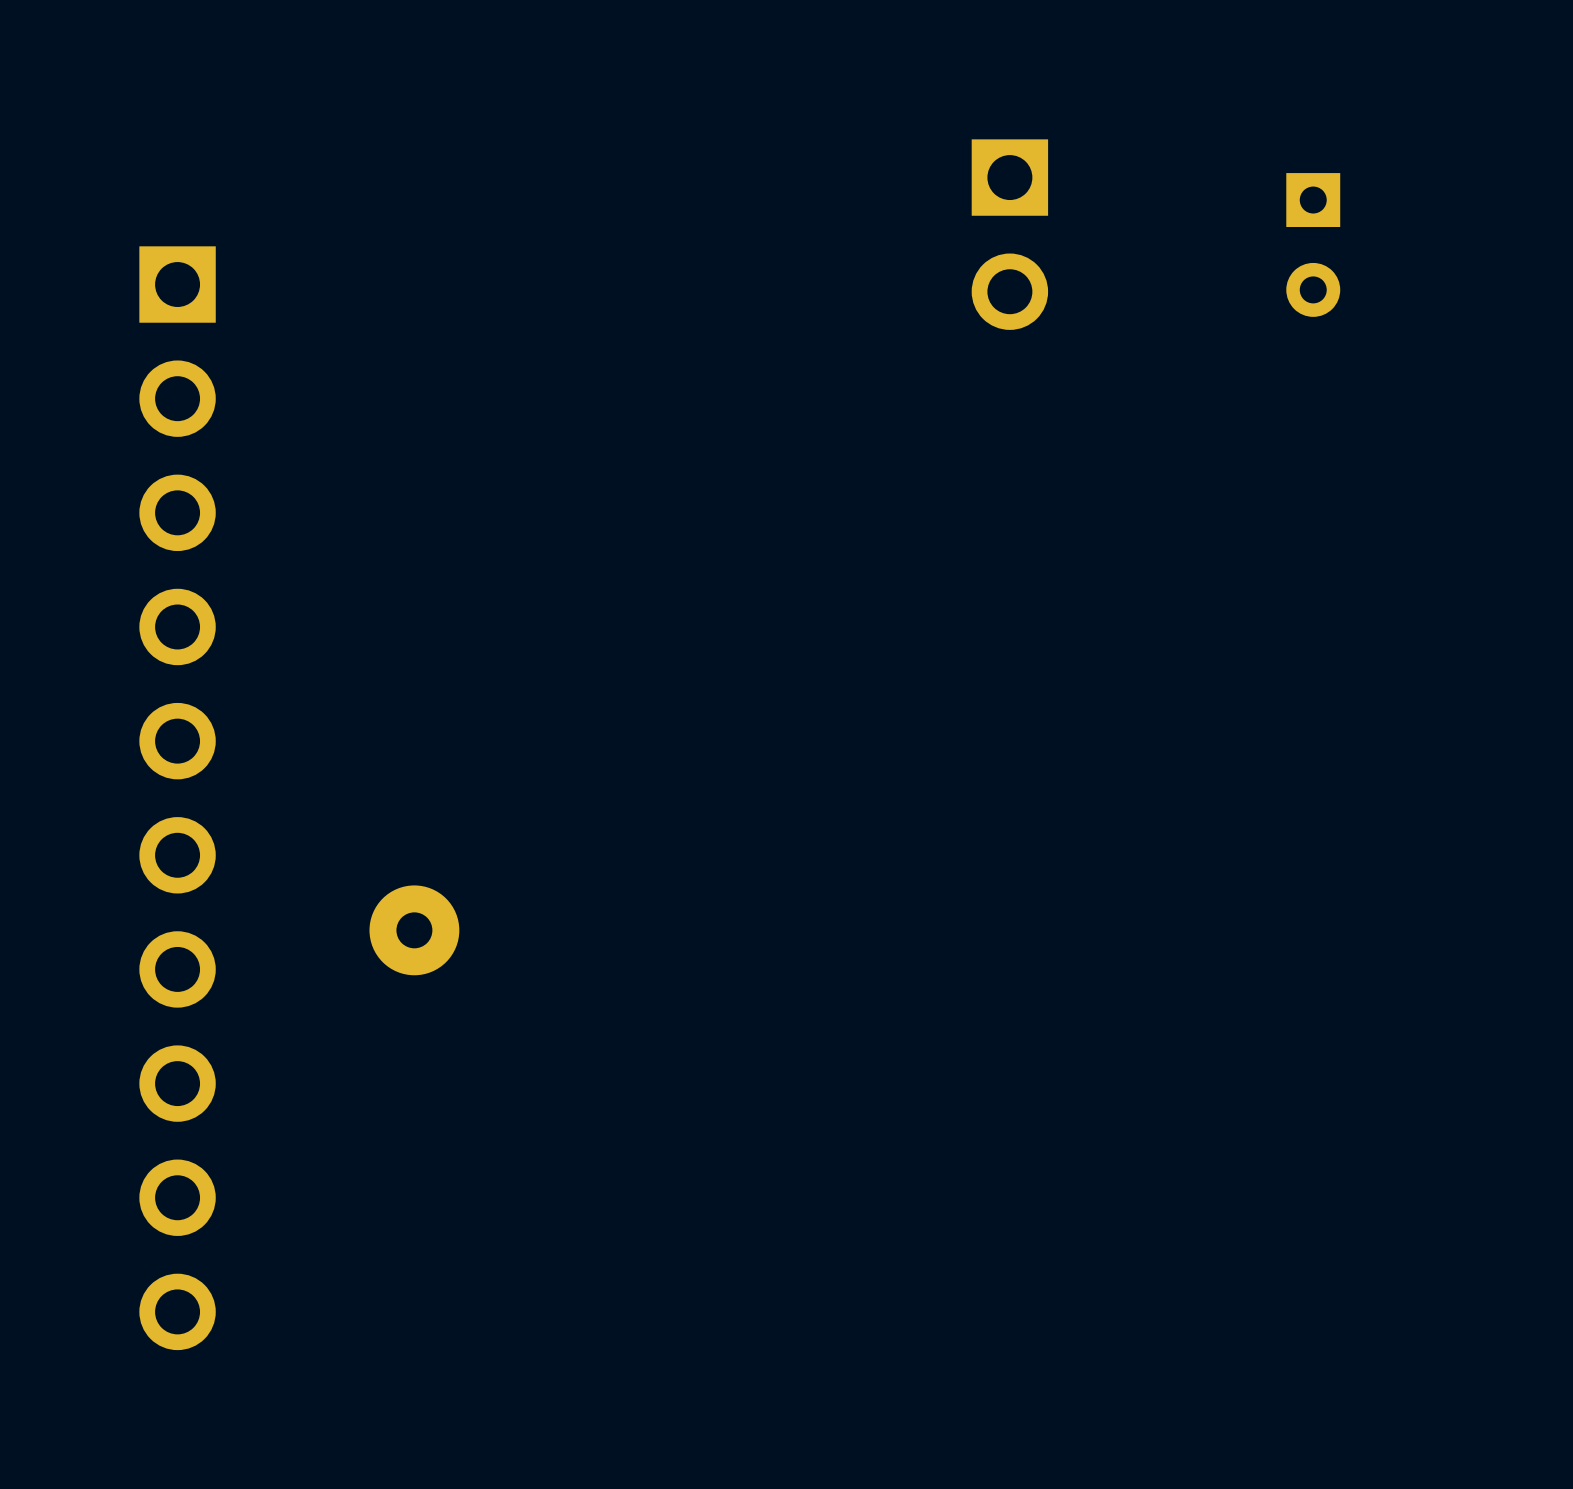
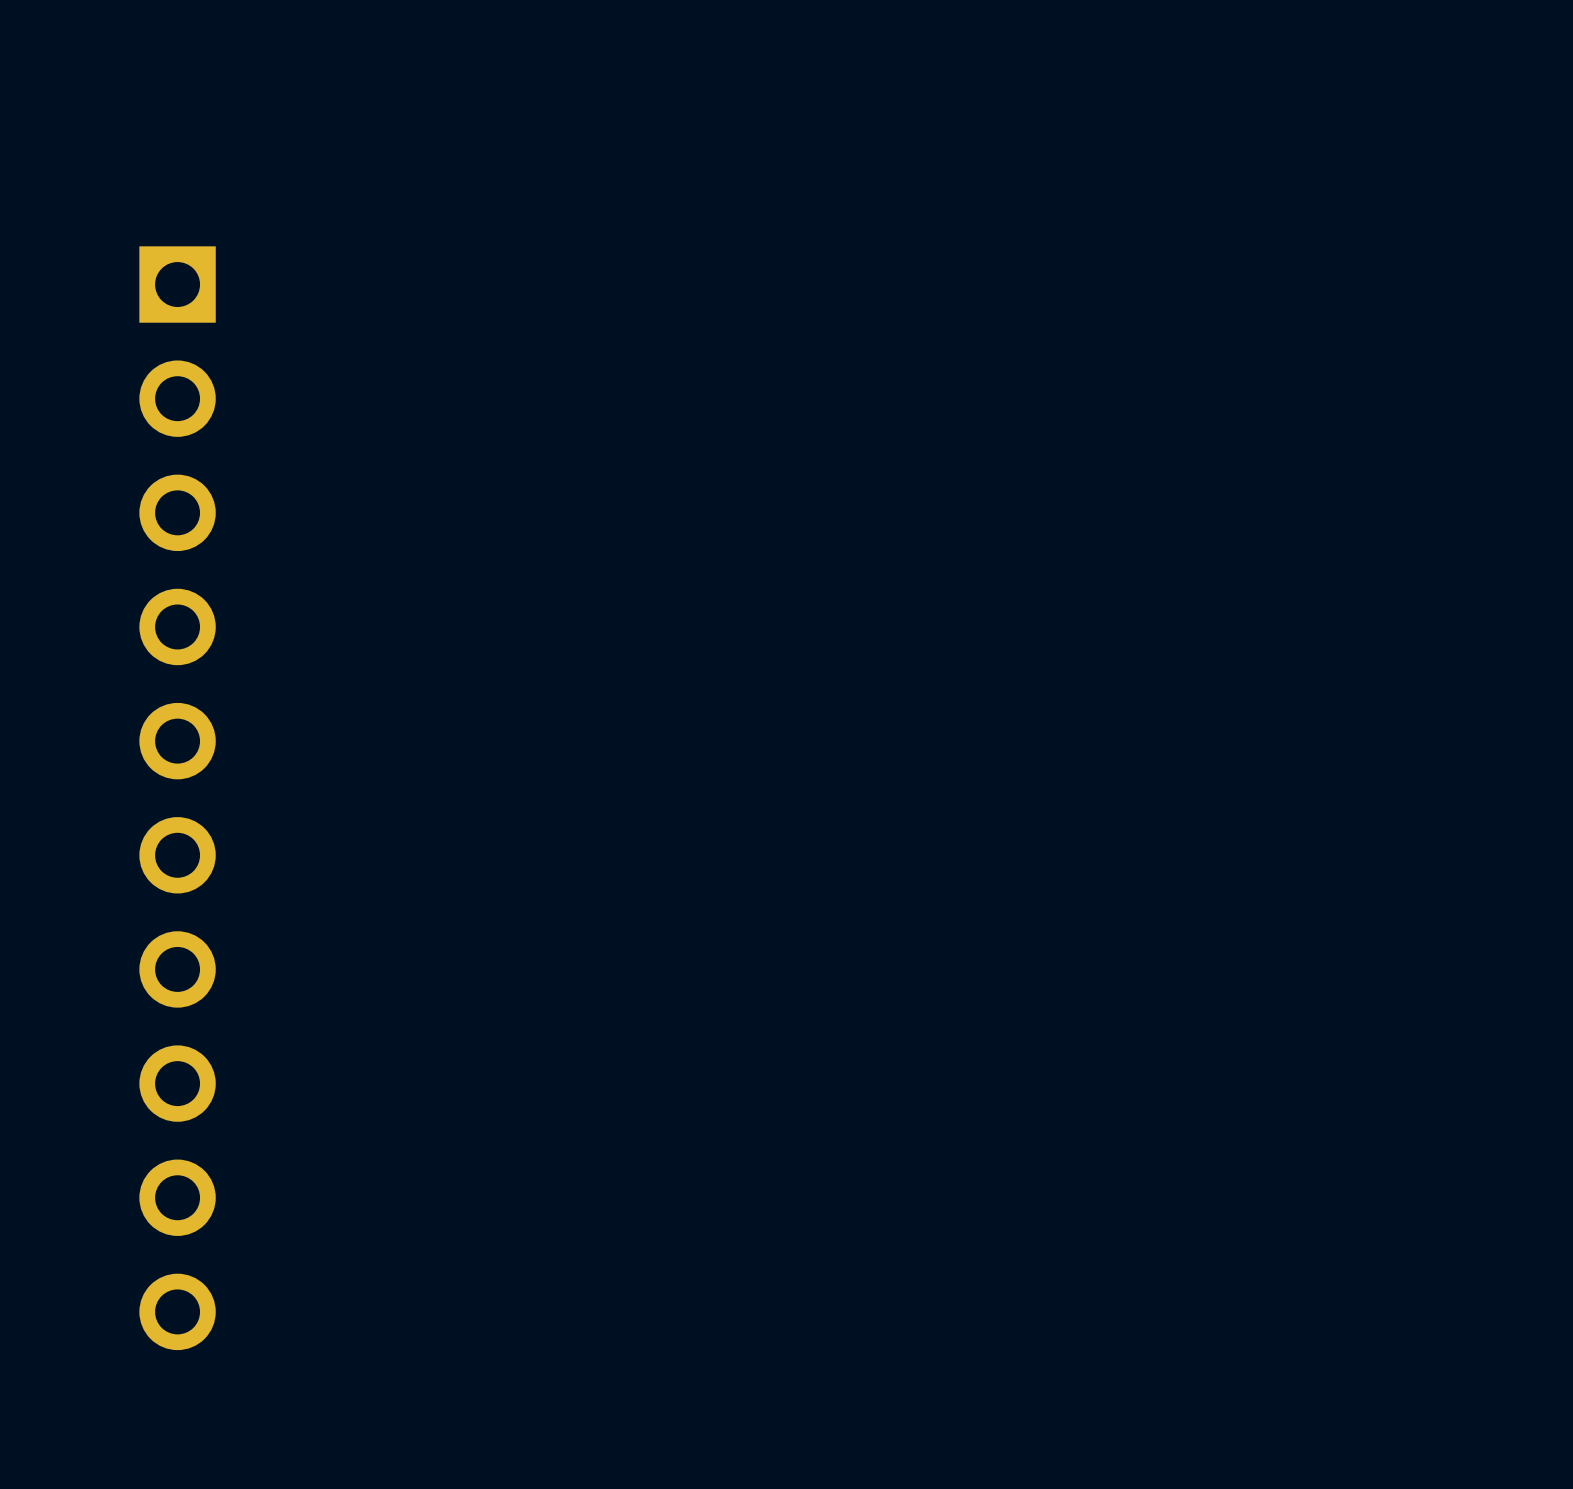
part: (1009, 234) -> none
part: (1313, 244) -> none
part: (414, 930) -> none

